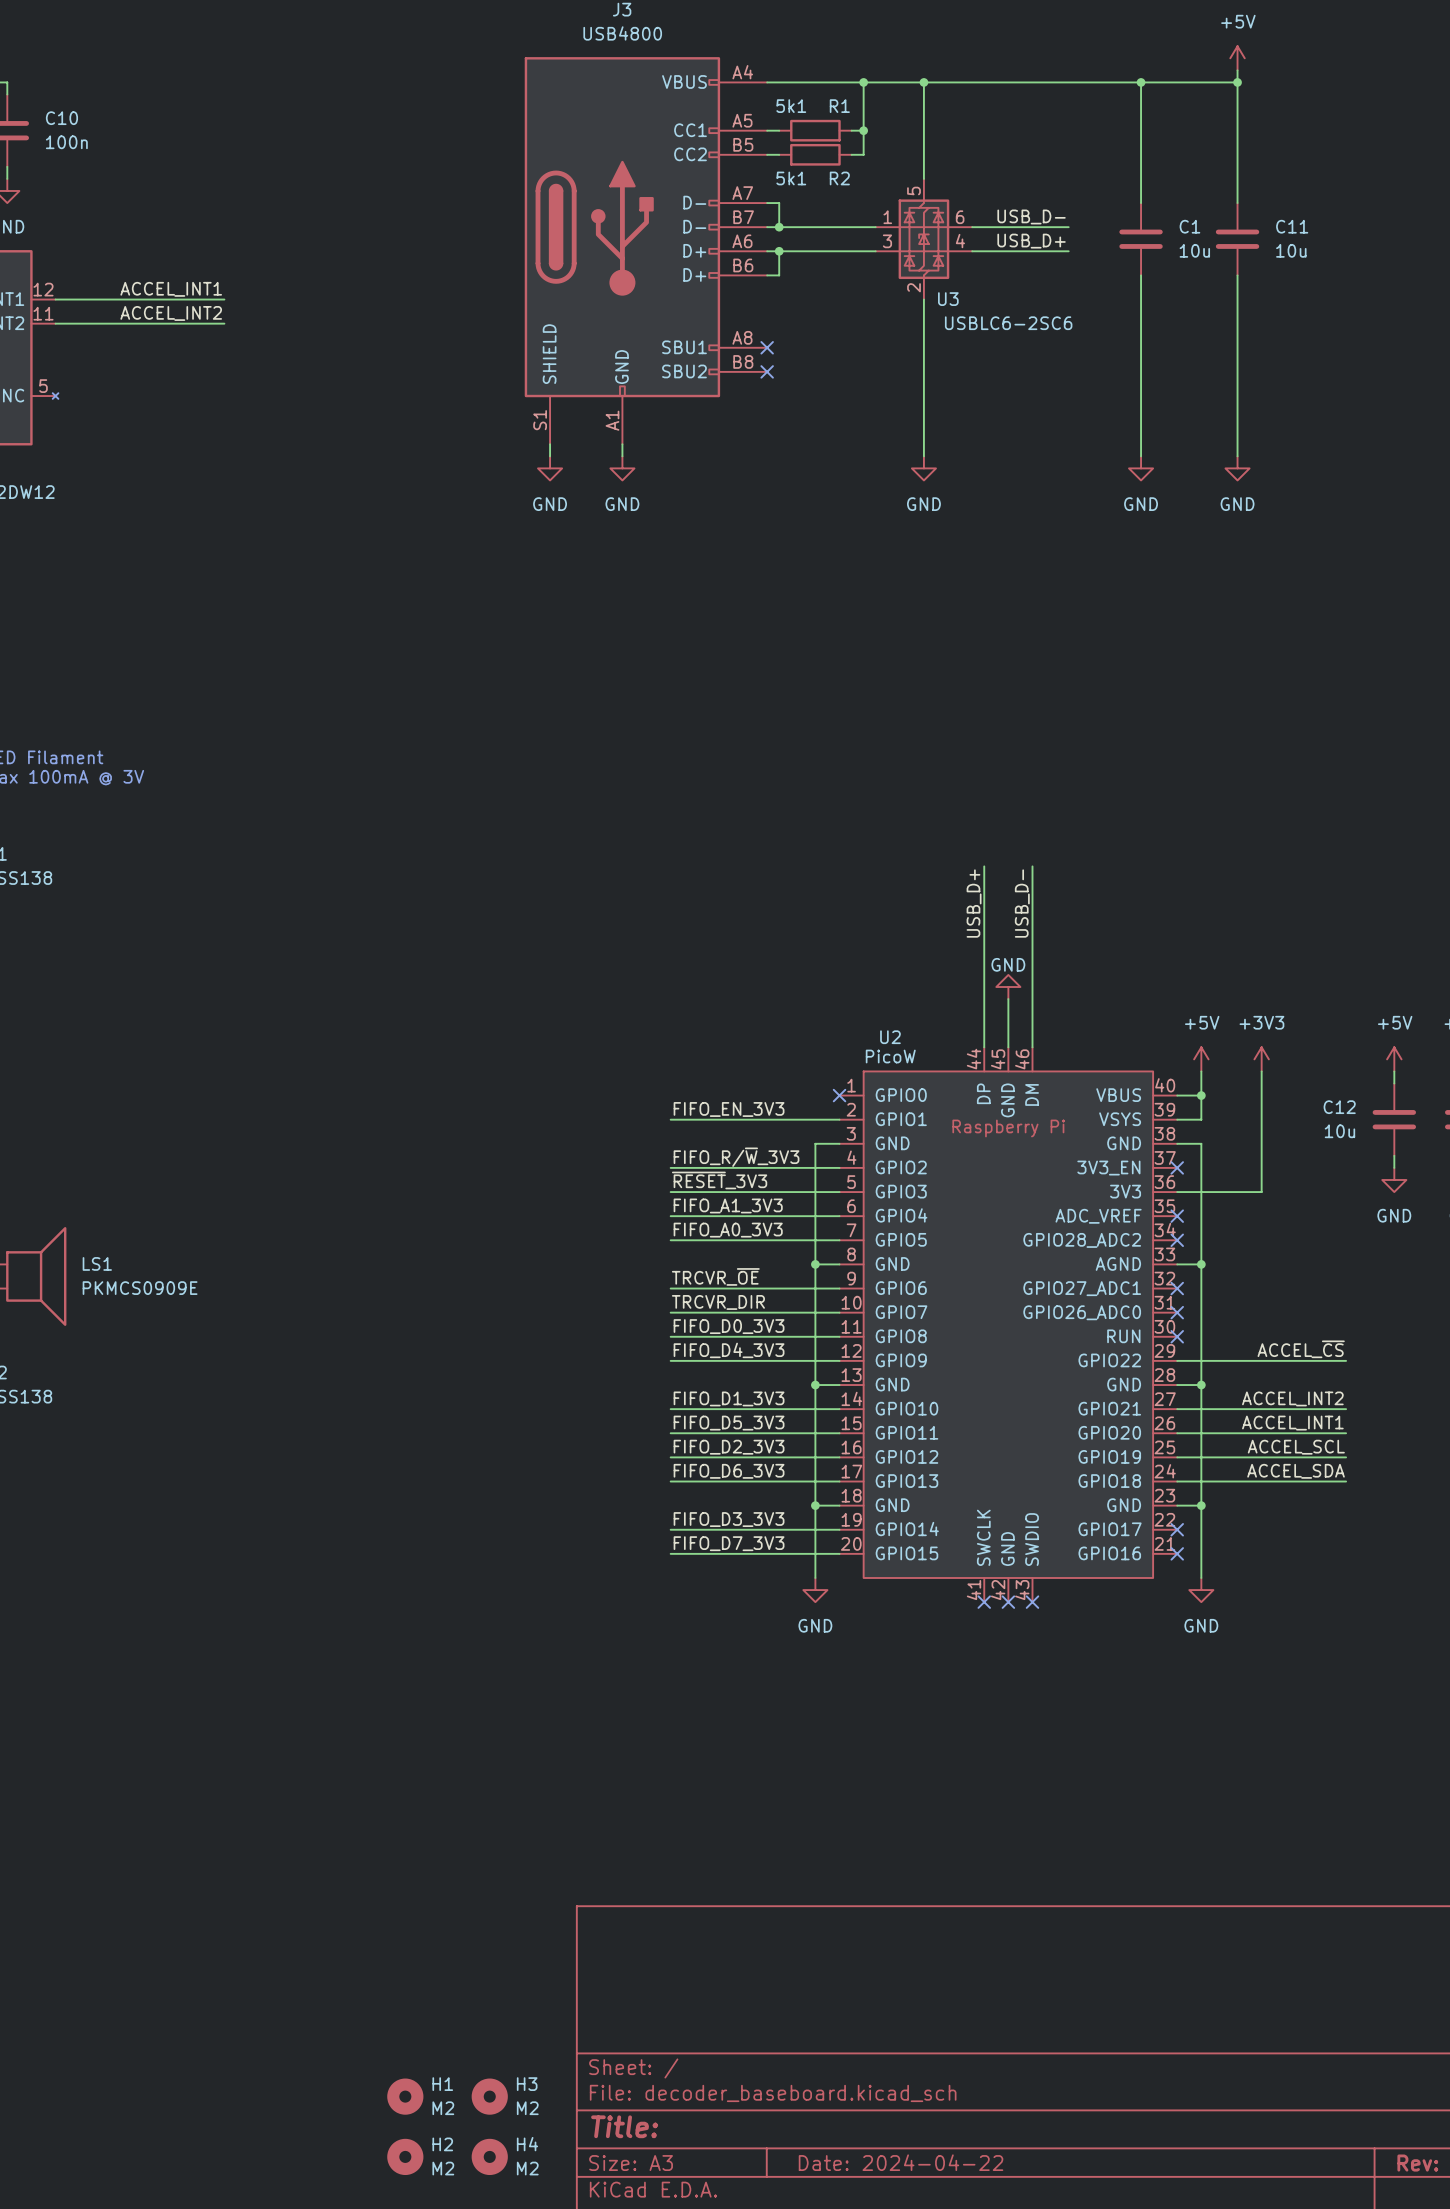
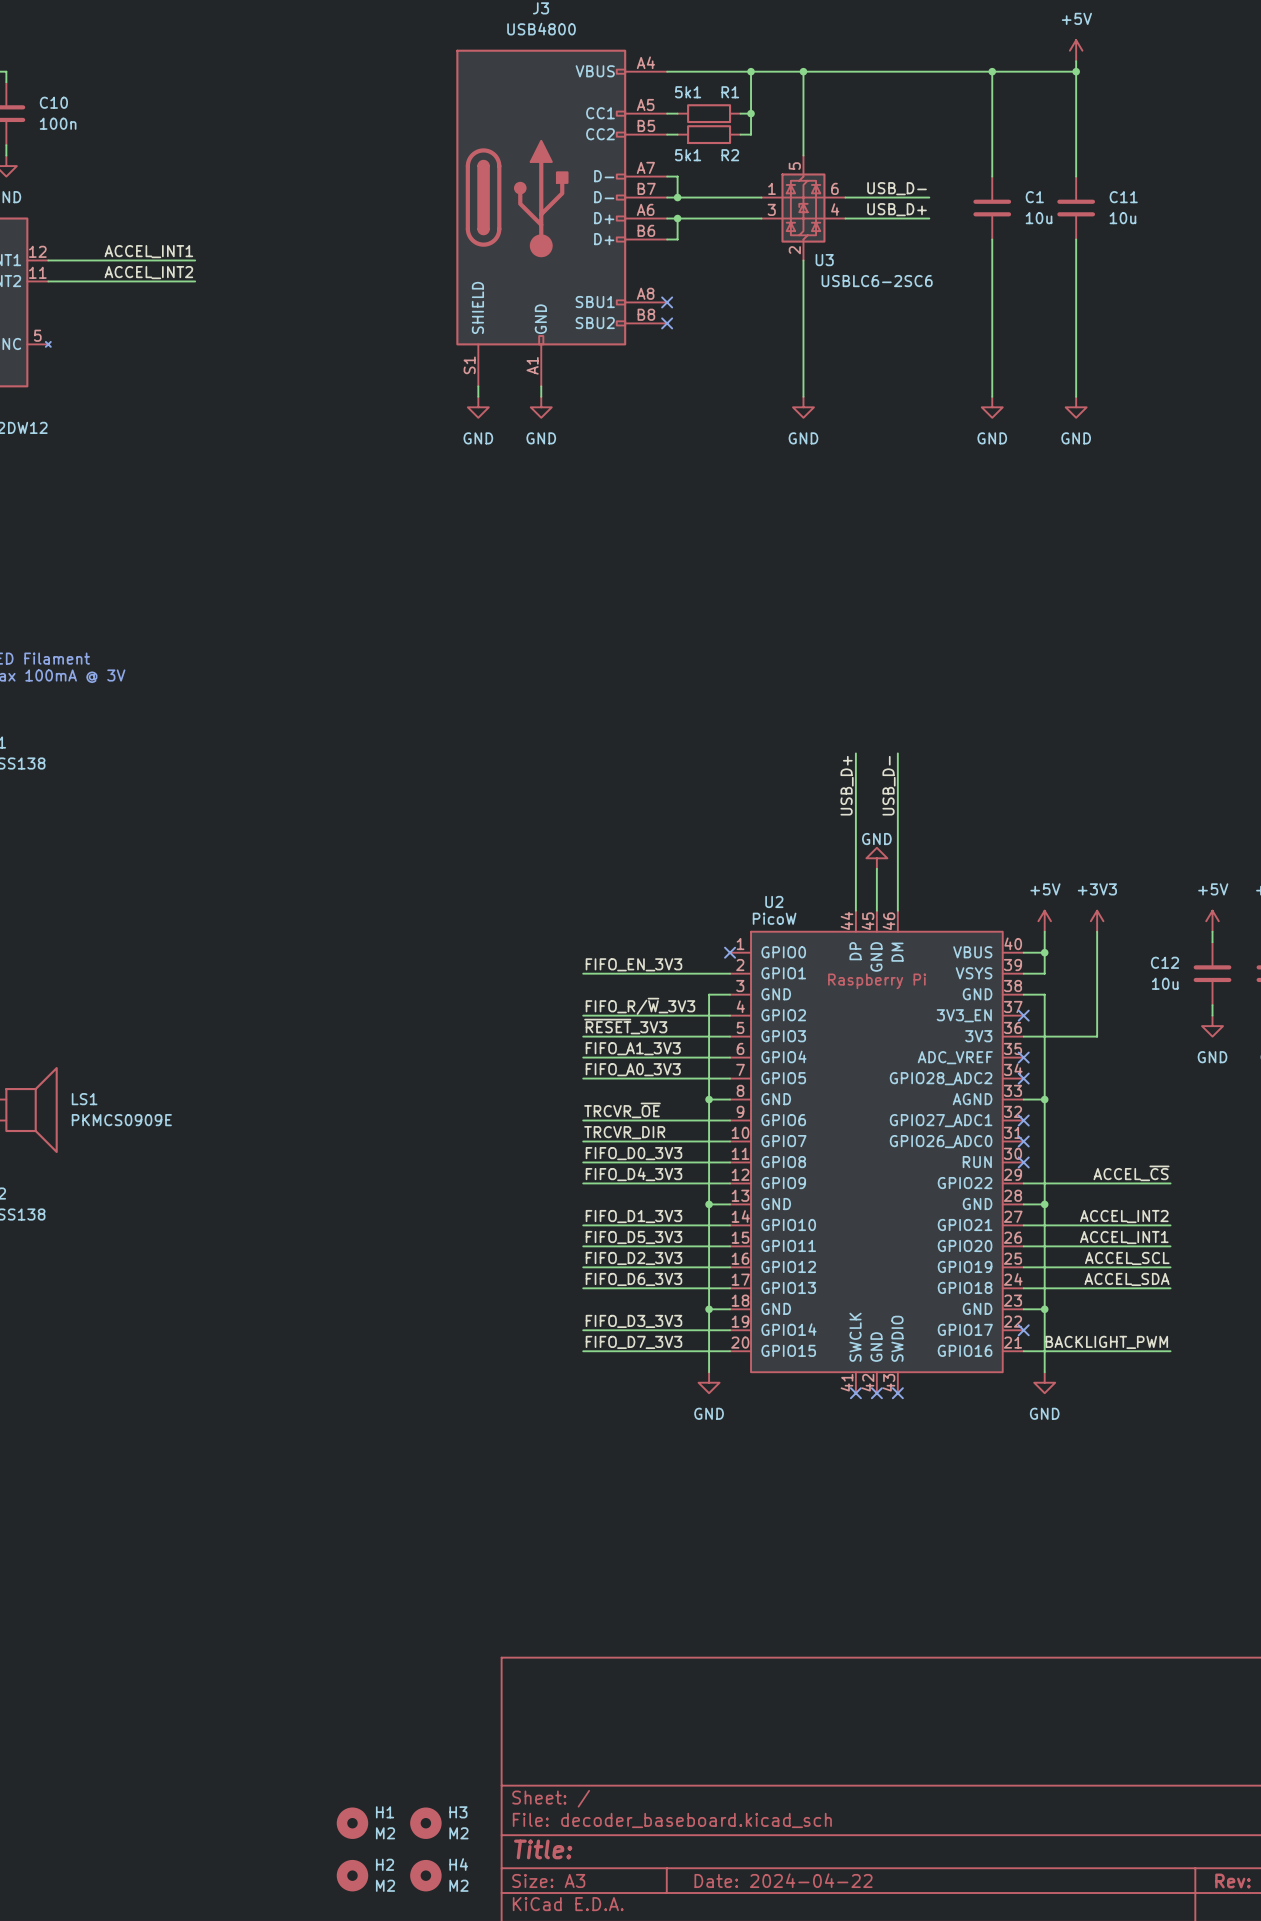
label: none -> BACKLIGHT_PWM (1106, 1342)
wire: none -> (1023, 1351) (1170, 1351)
no-connect mark: (1177, 1553) -> none

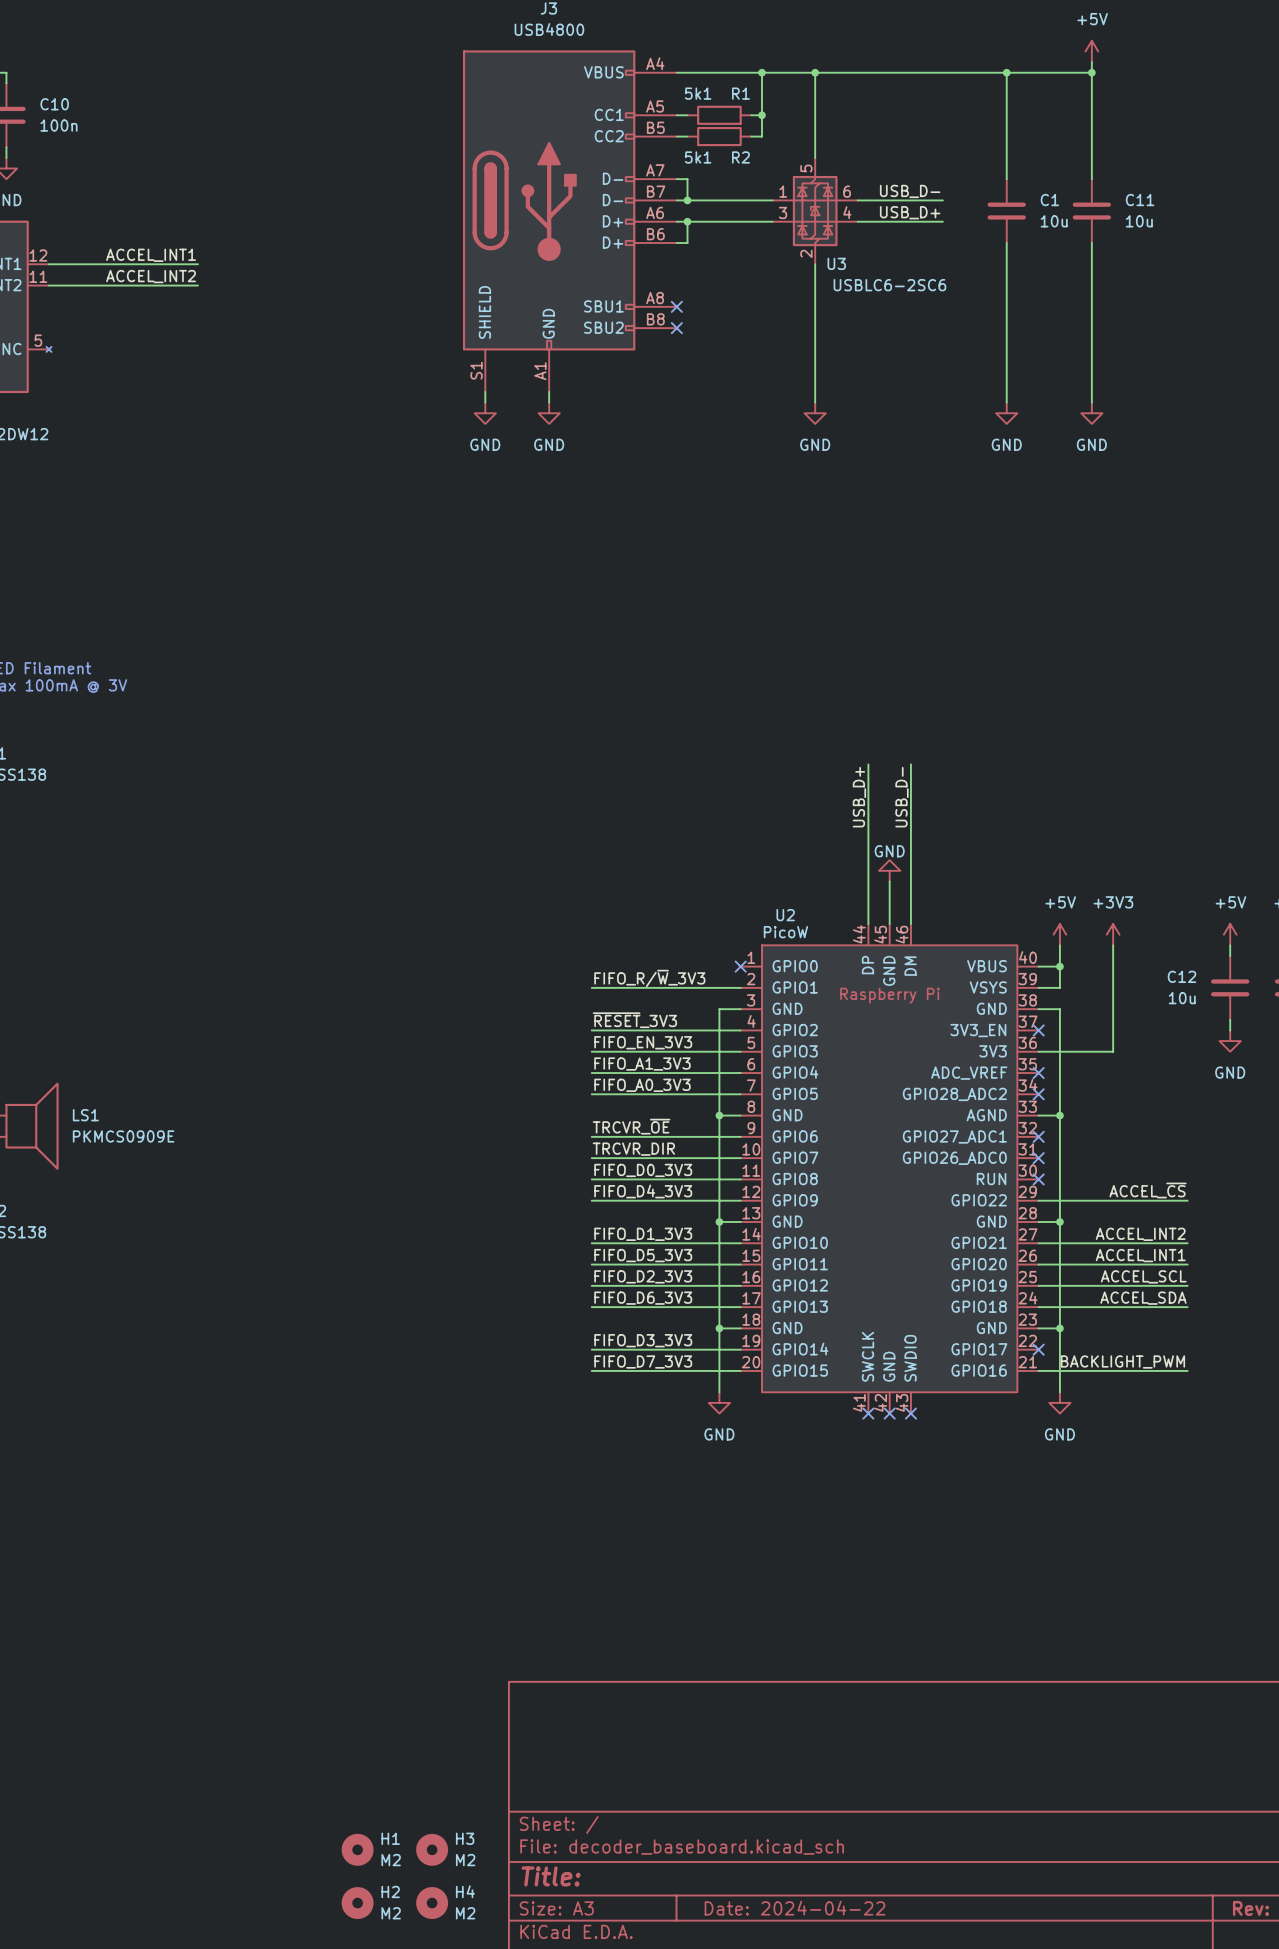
label: FIFO_EN_3V3 (633, 964) -> FIFO_R/~{W}_3V3 (649, 978)
label: FIFO_R/~{W}_3V3 (640, 1006) -> ~{RESET}_3V3 (634, 1020)
label: ~{RESET}_3V3 (625, 1026) -> FIFO_EN_3V3 (643, 1042)

